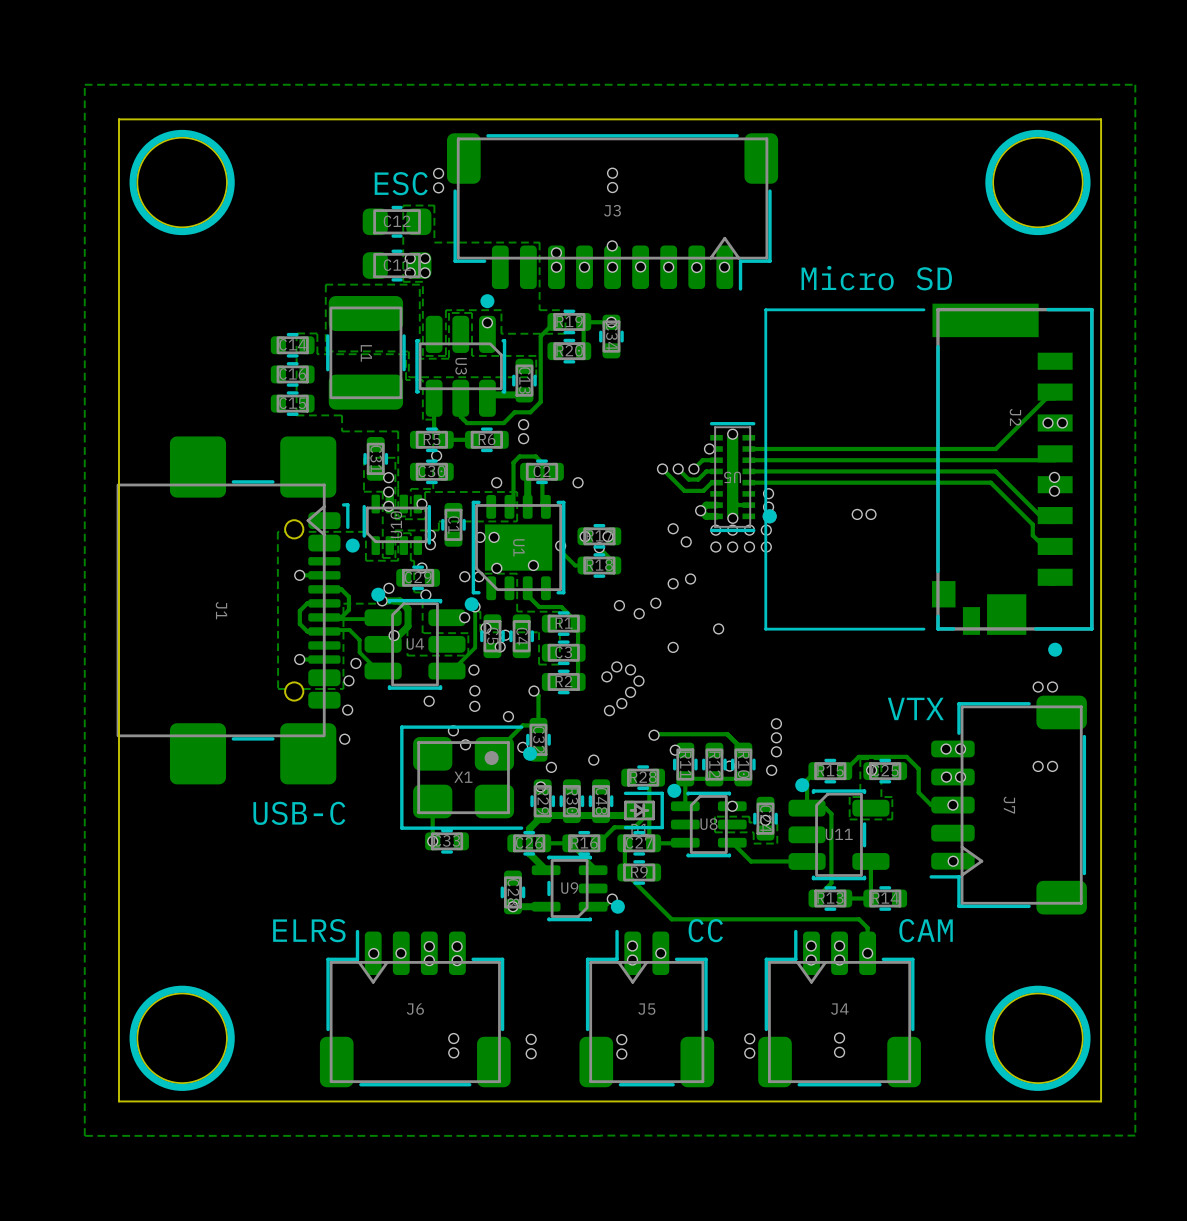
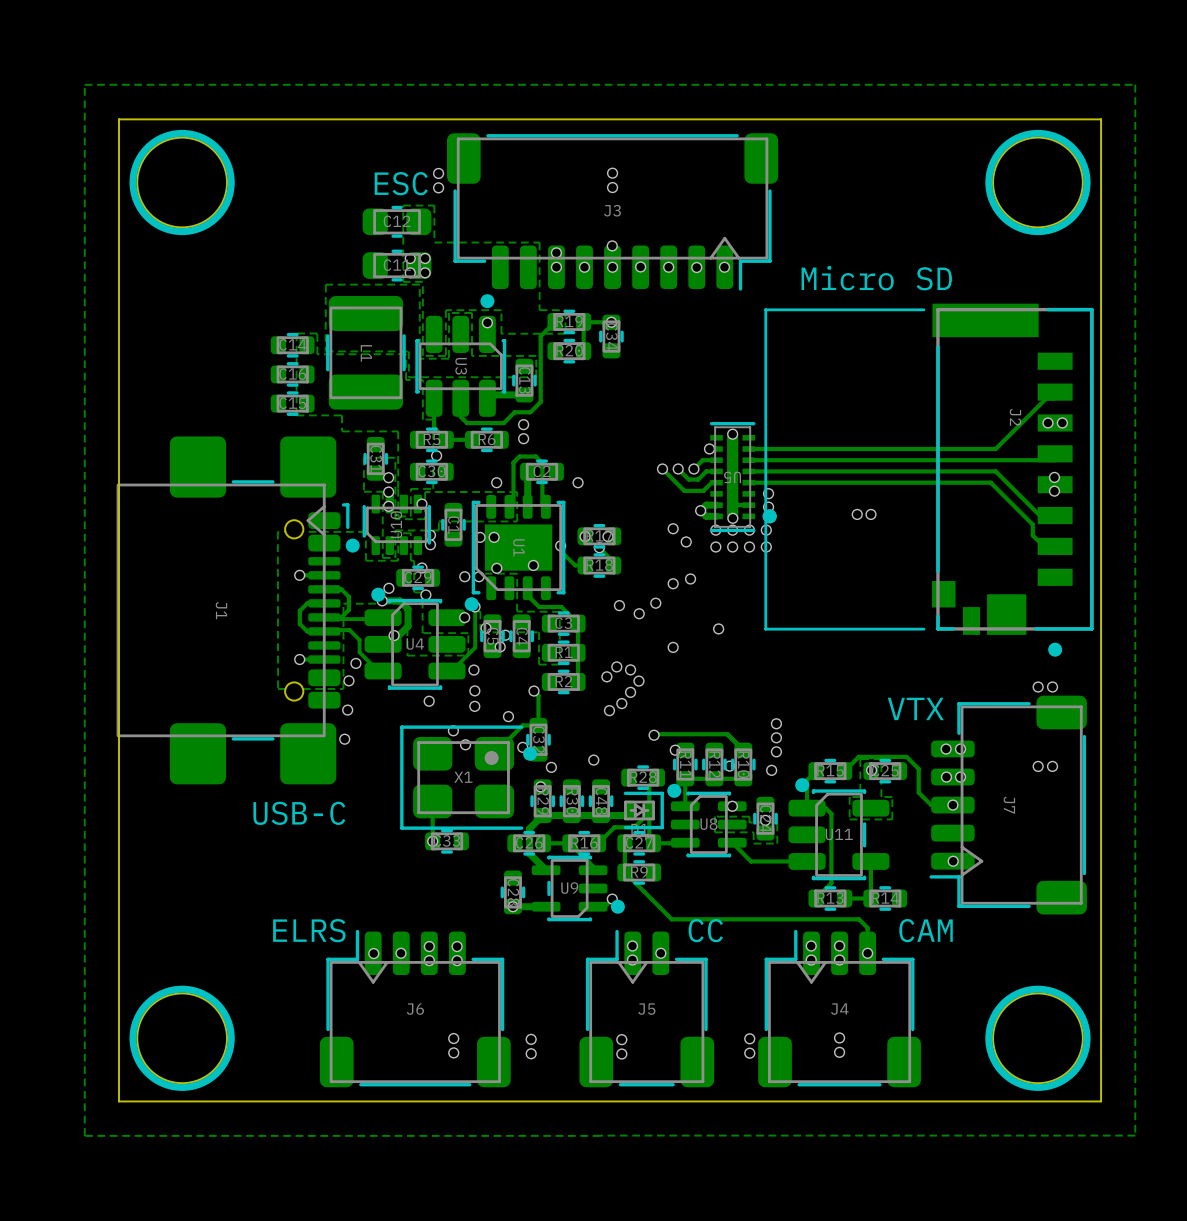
R1 name: R1 (564, 623) -> C3 (563, 623)
C3 name: C3 (563, 652) -> R1 (564, 652)

